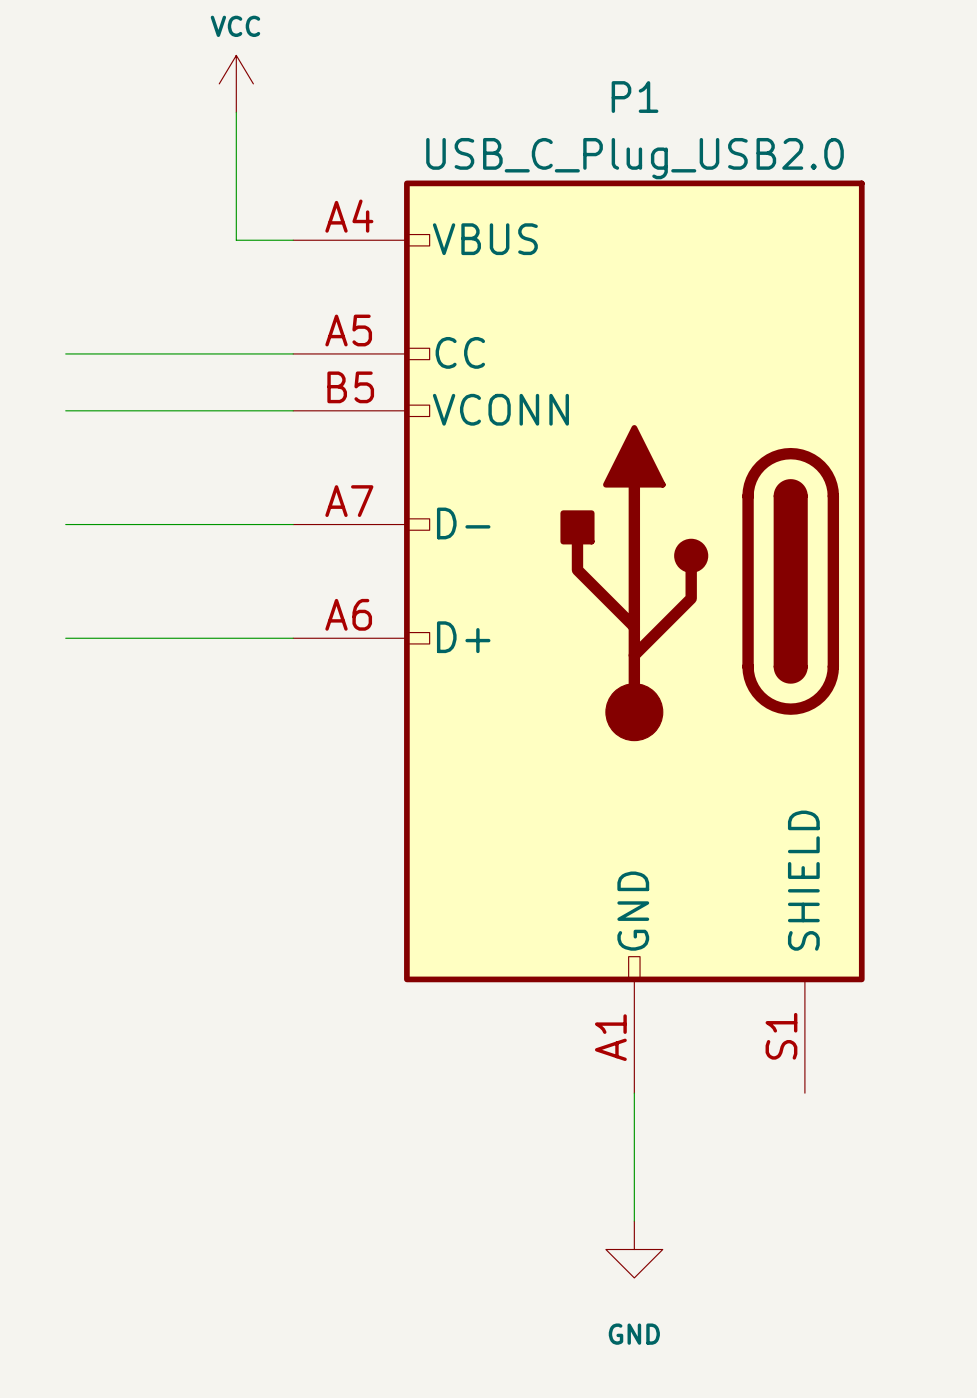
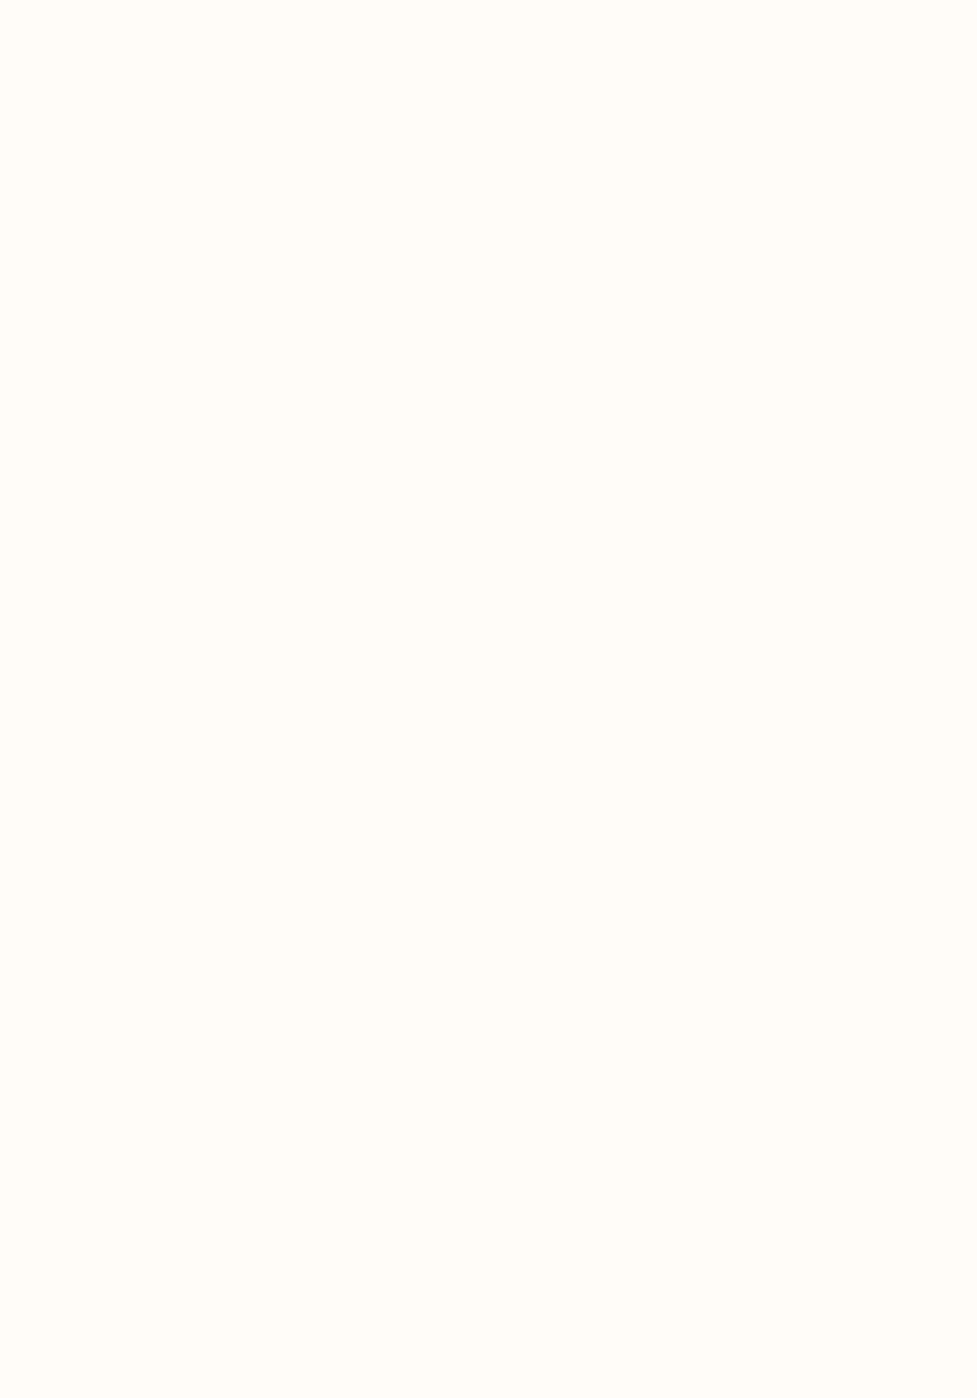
power symbol: VCC (236, 83) -> none
wire: (236, 112) (236, 240) (293, 240) -> none
wire: (65, 353) (293, 353) -> none
wire: (65, 410) (293, 410) -> none
wire: (65, 524) (293, 524) -> none
P1: USB_C_Plug_USB2.0 (578, 636) -> none
wire: (65, 638) (293, 638) -> none
wire: (634, 1093) (634, 1221) -> none
power symbol: GND (634, 1249) -> none

